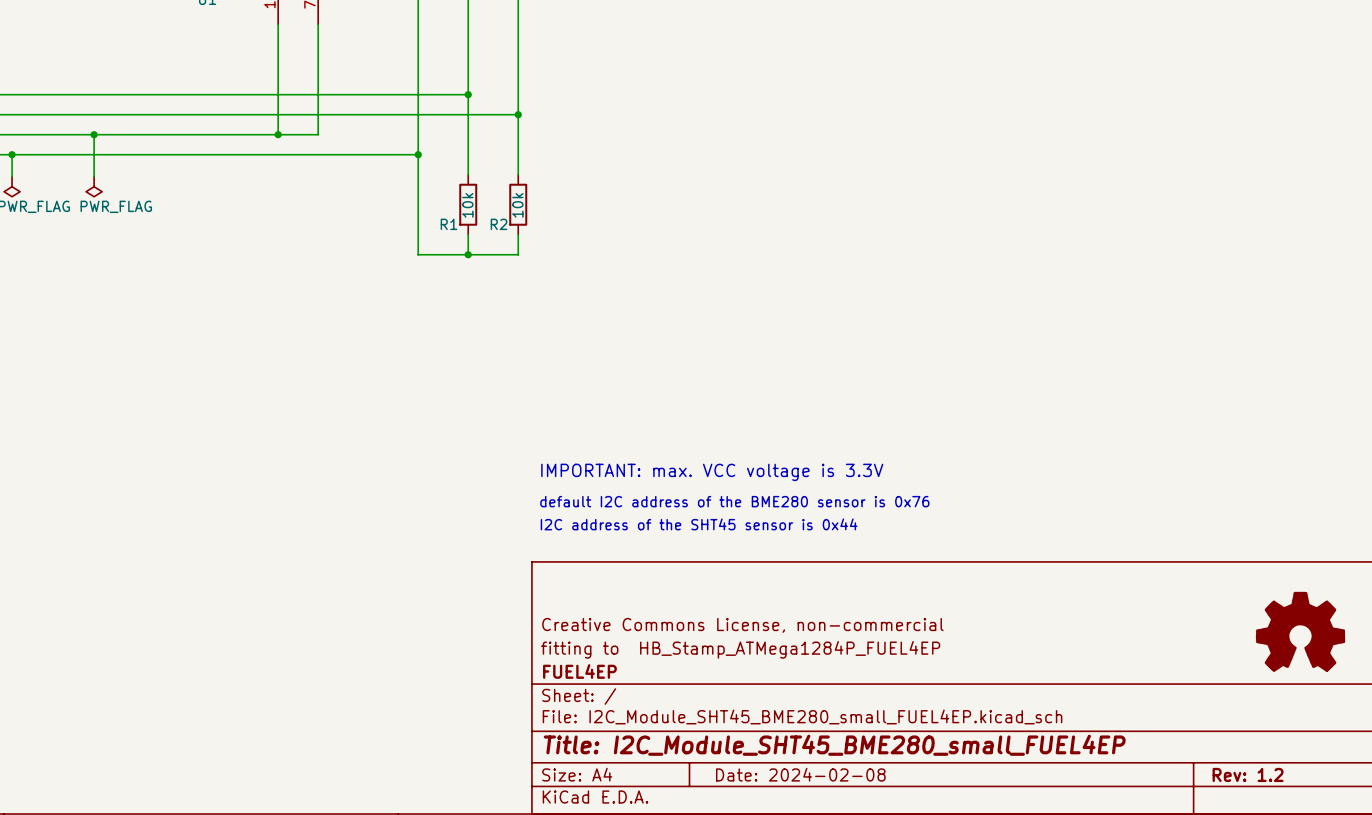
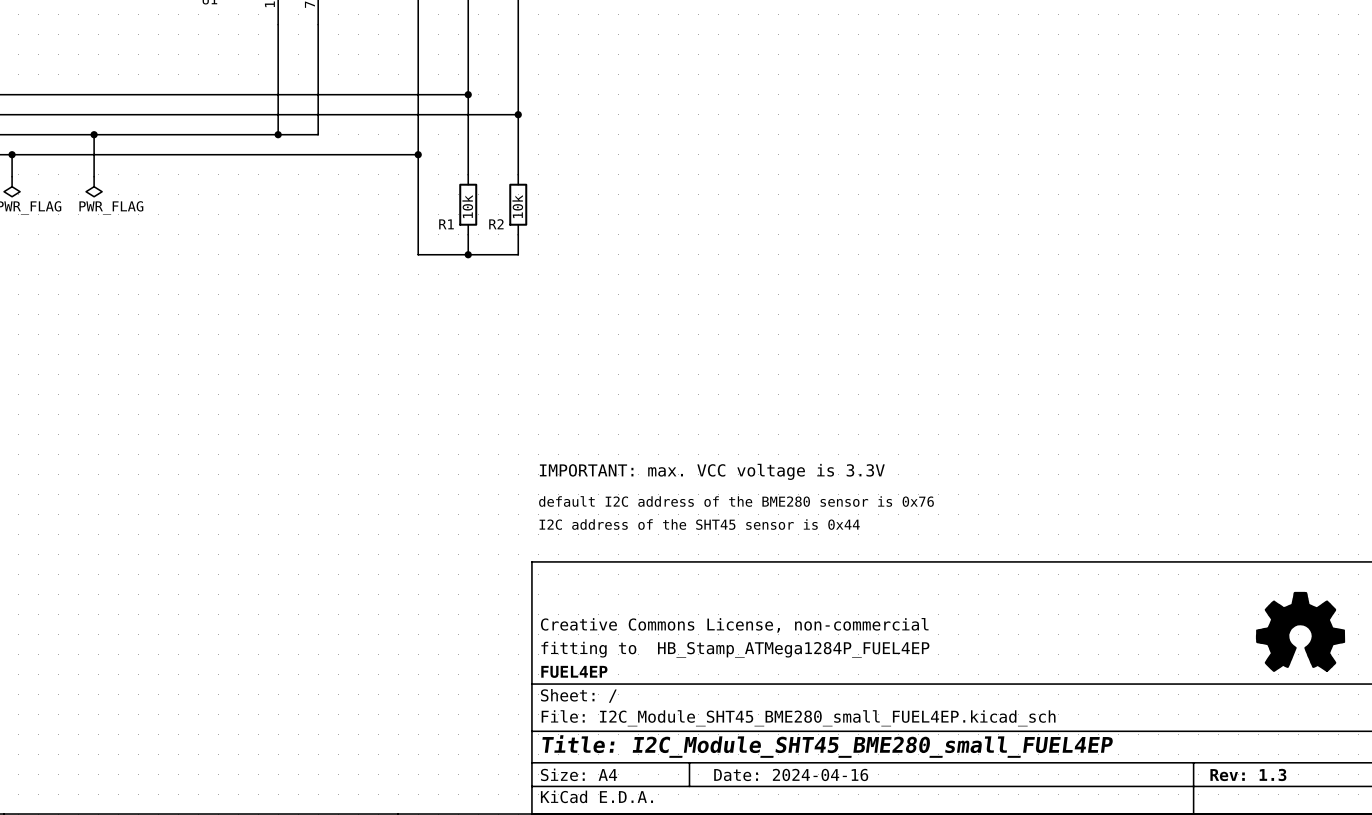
title block: Date: 2024-02-08 (800, 774) -> Date: 2024-04-16 (791, 774)
title block: Rev: 1.2 (1248, 774) -> Rev: 1.3 (1248, 774)

